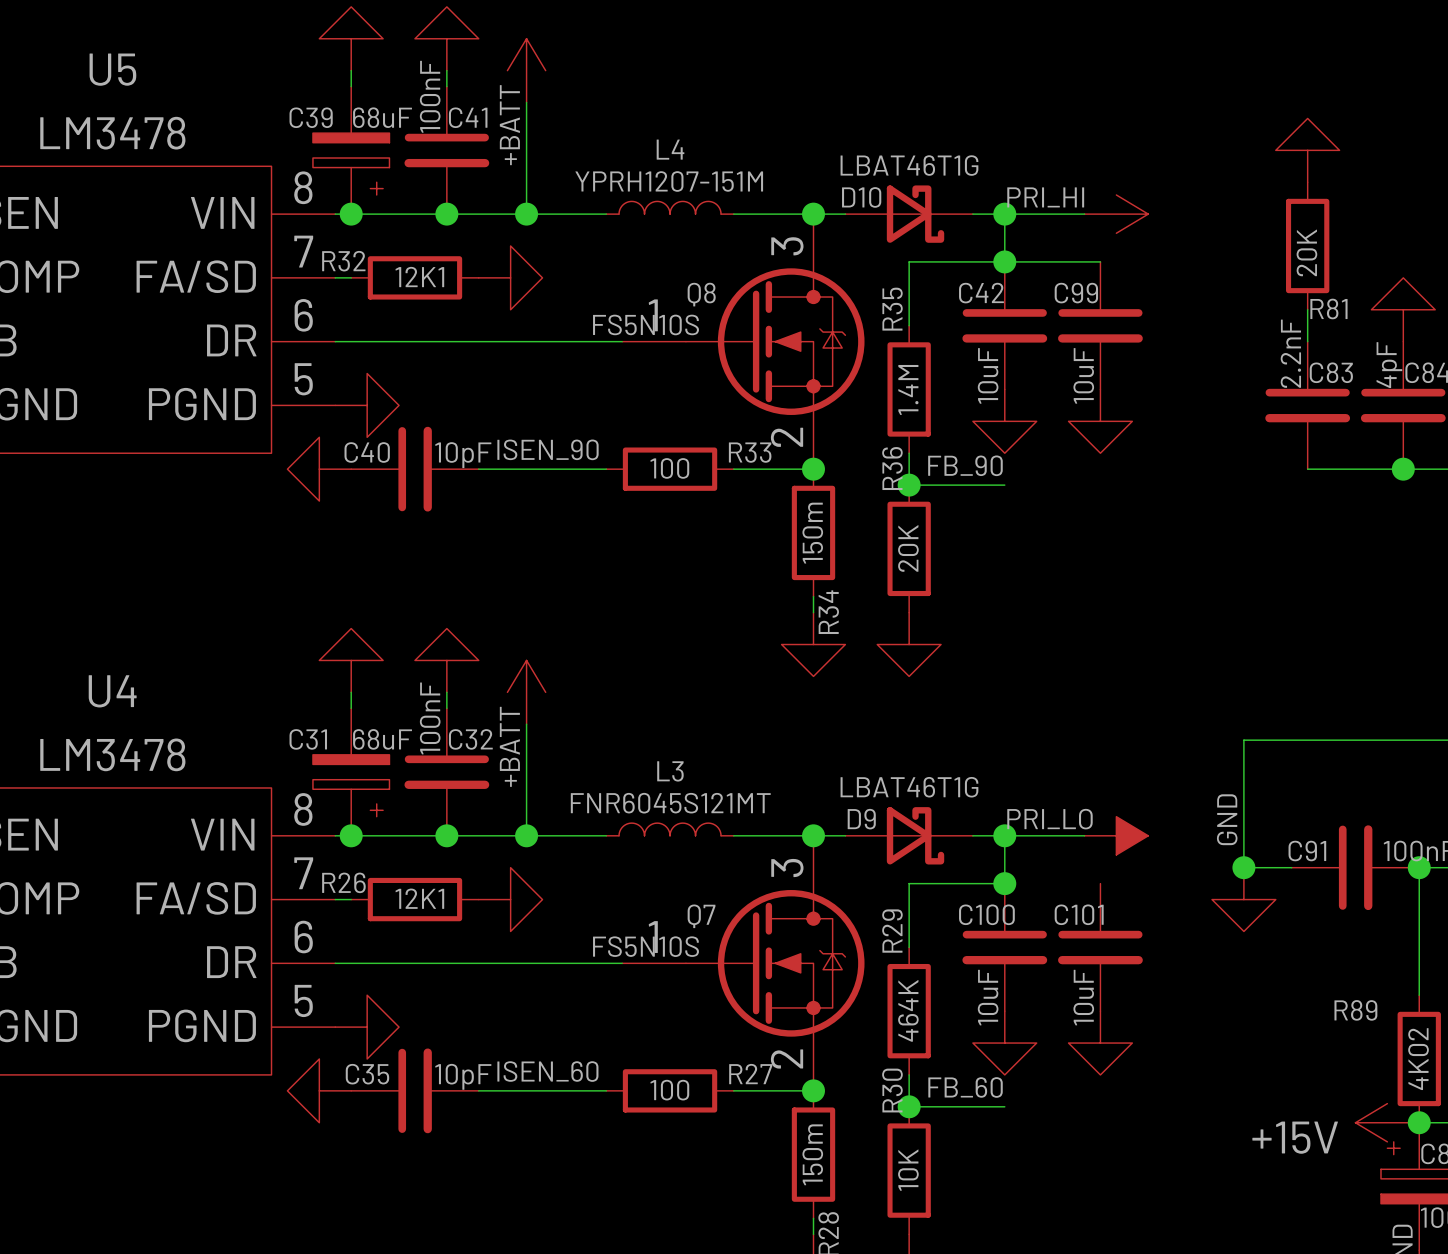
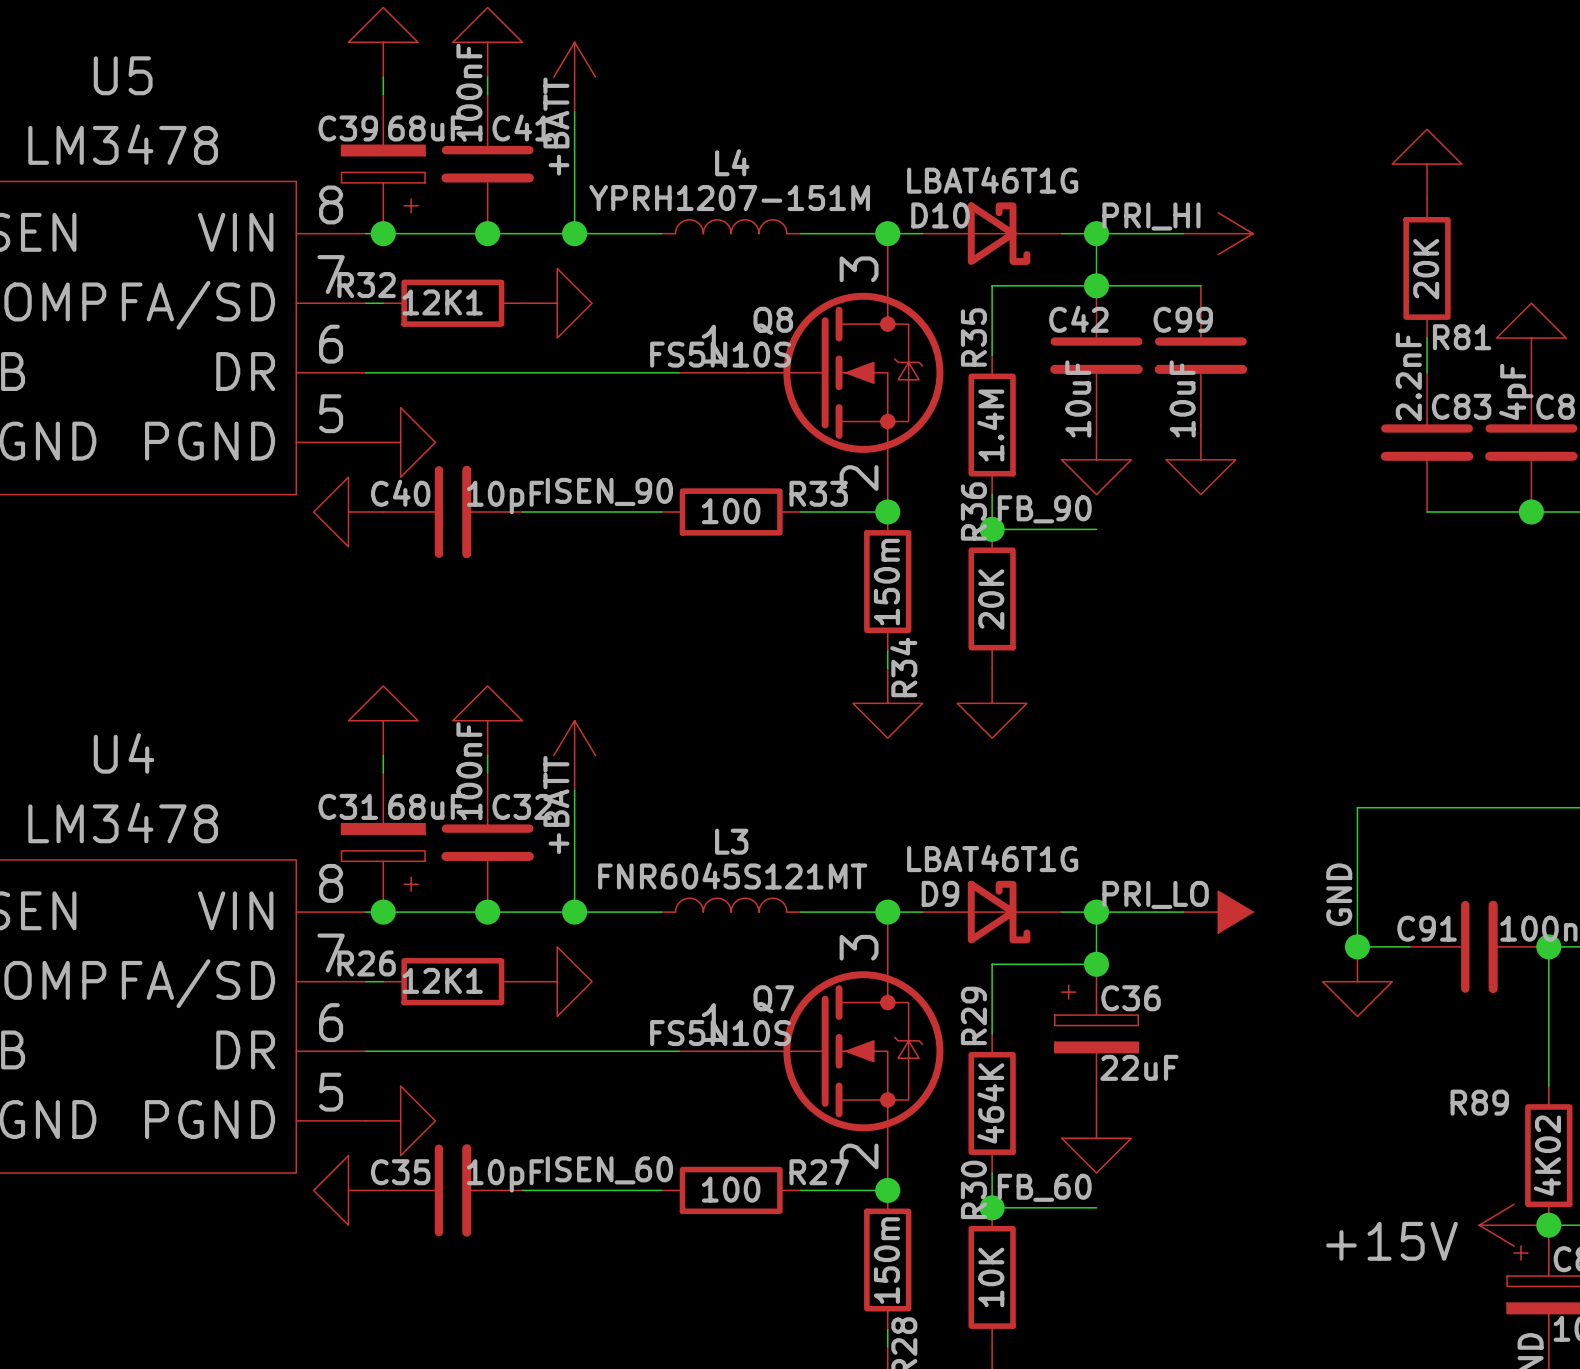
C100: 10uF (1004, 947) -> none
C36: none -> 22uF (1096, 1033)
C101: 10uF (1100, 947) -> none
power symbol: (1100, 1043) -> none

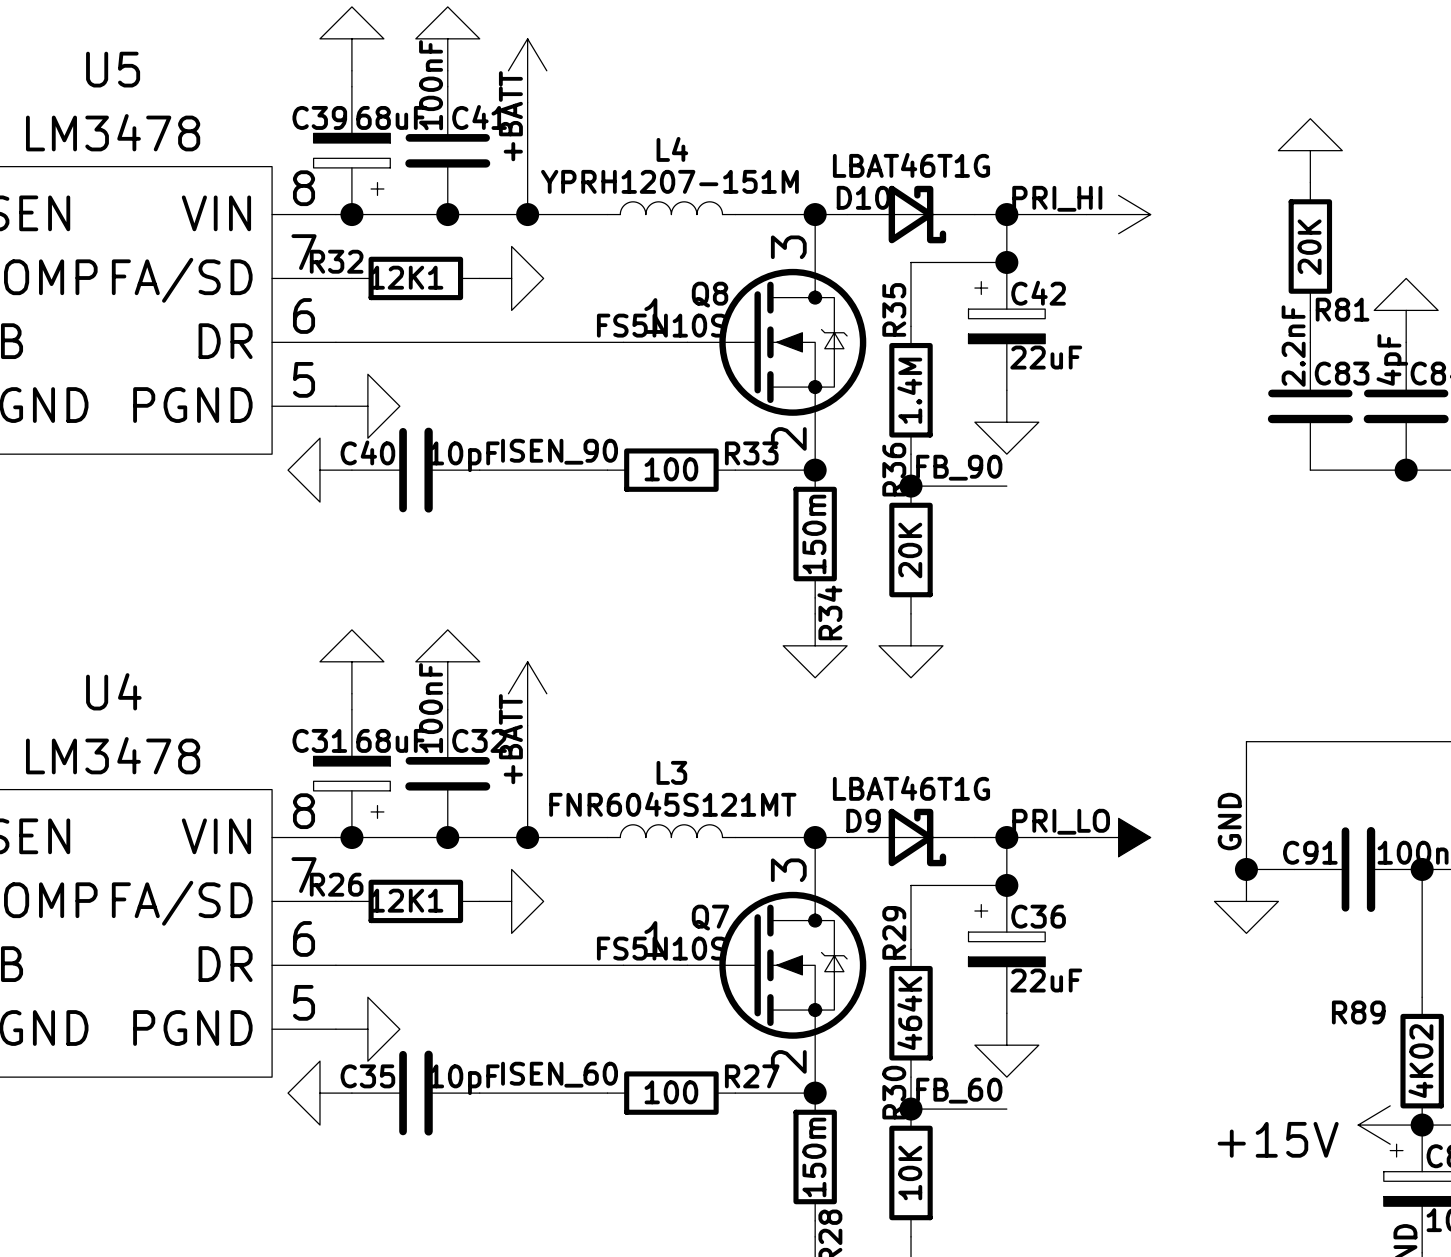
C42 symbol: [1050, 285, 1143, 426] -> [968, 262, 1046, 391]
wire: (1096, 285) (1200, 285) -> none
C99: 10uF (1200, 355) -> none
C42 value: 10uF (1078, 398) -> 22uF (1046, 357)
power symbol: (1200, 459) -> none

